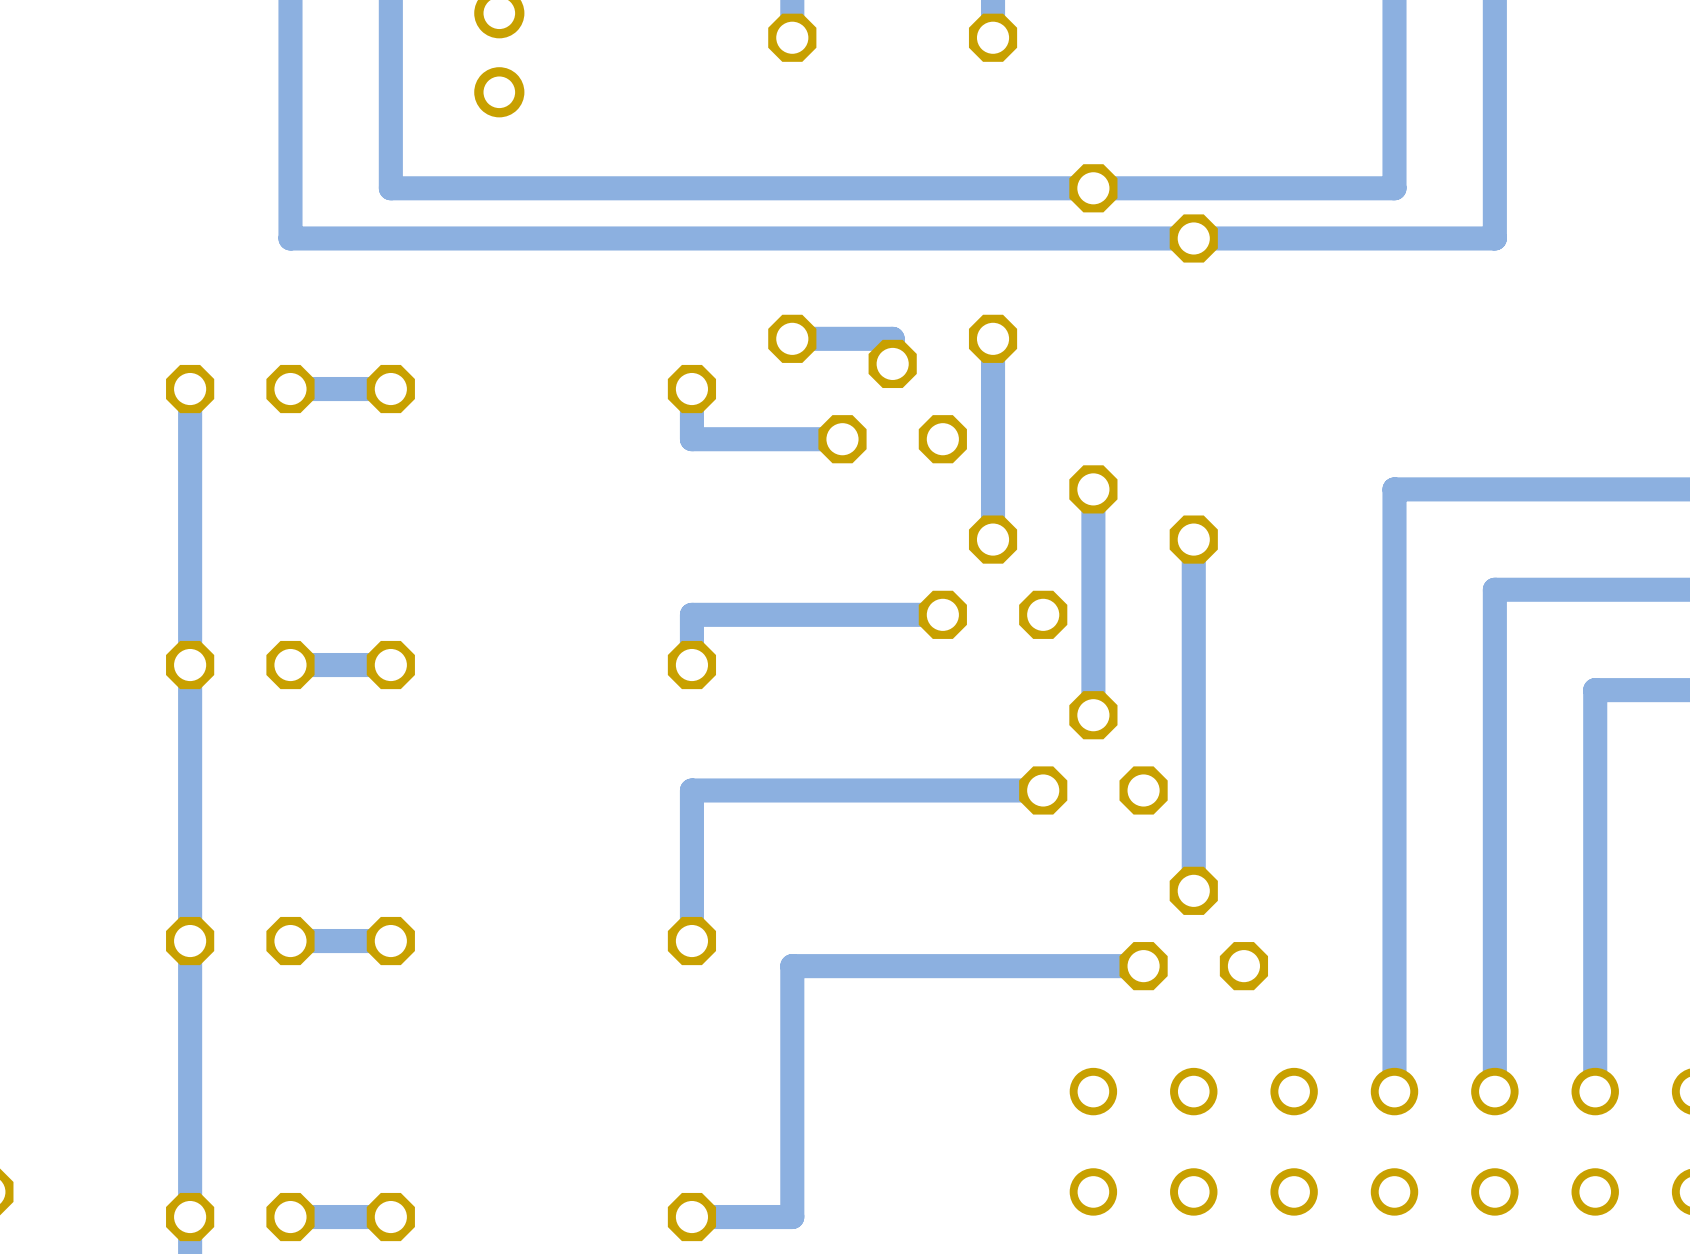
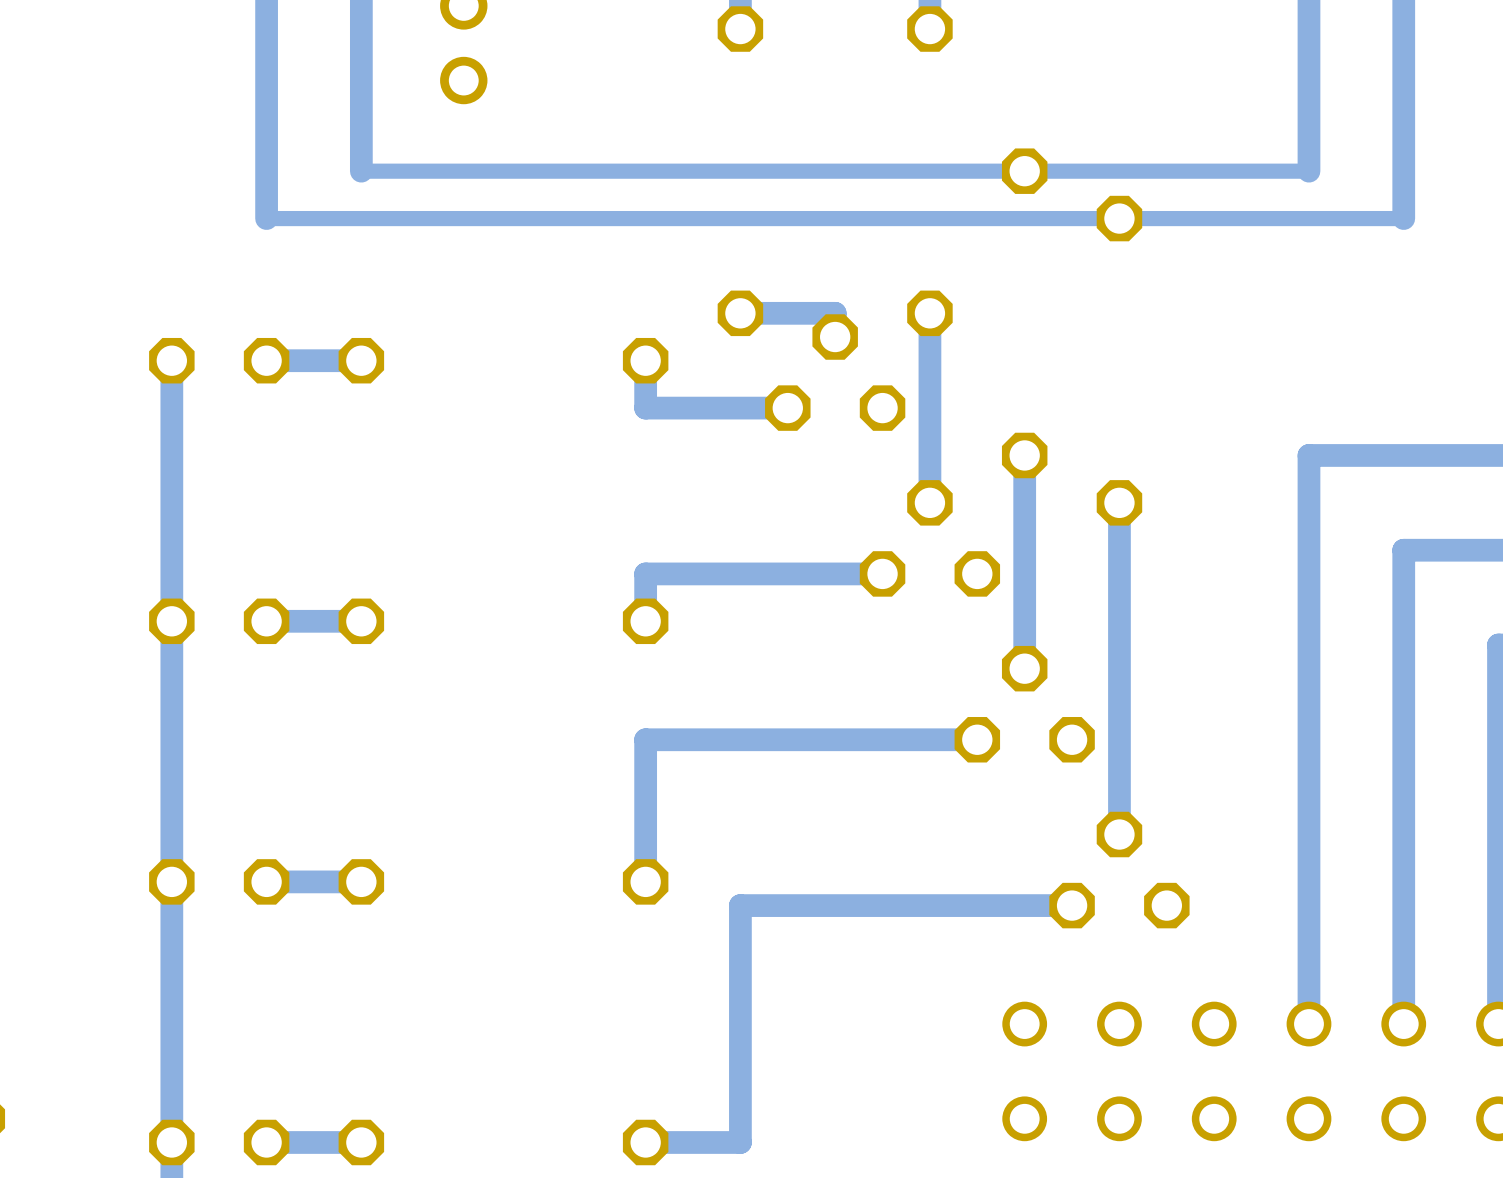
bottom track width: thick (1394, 188) (390, 188) -> thin (1308, 171) (361, 171)
bottom track width: thick (1494, 238) (290, 238) -> thin (1403, 218) (266, 218)

